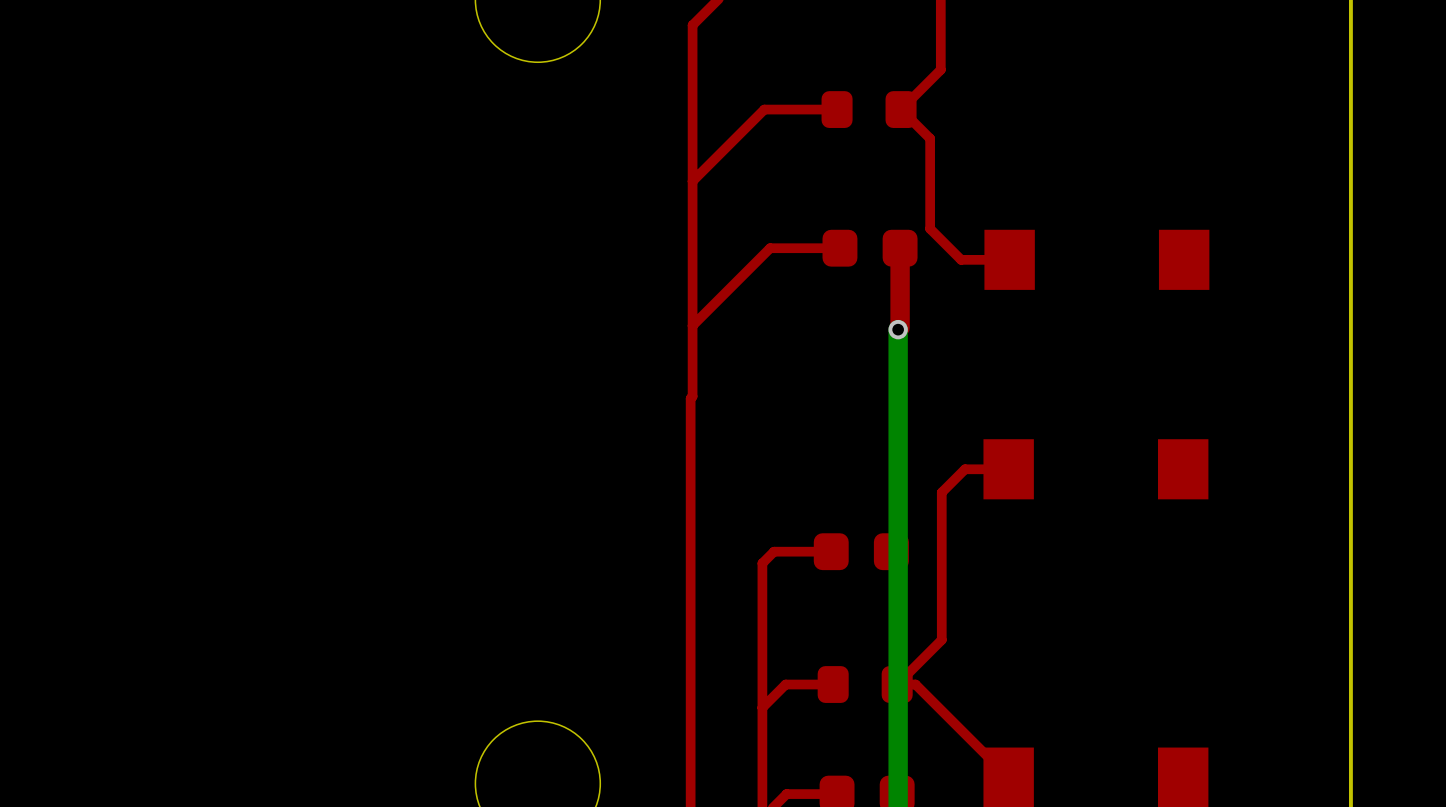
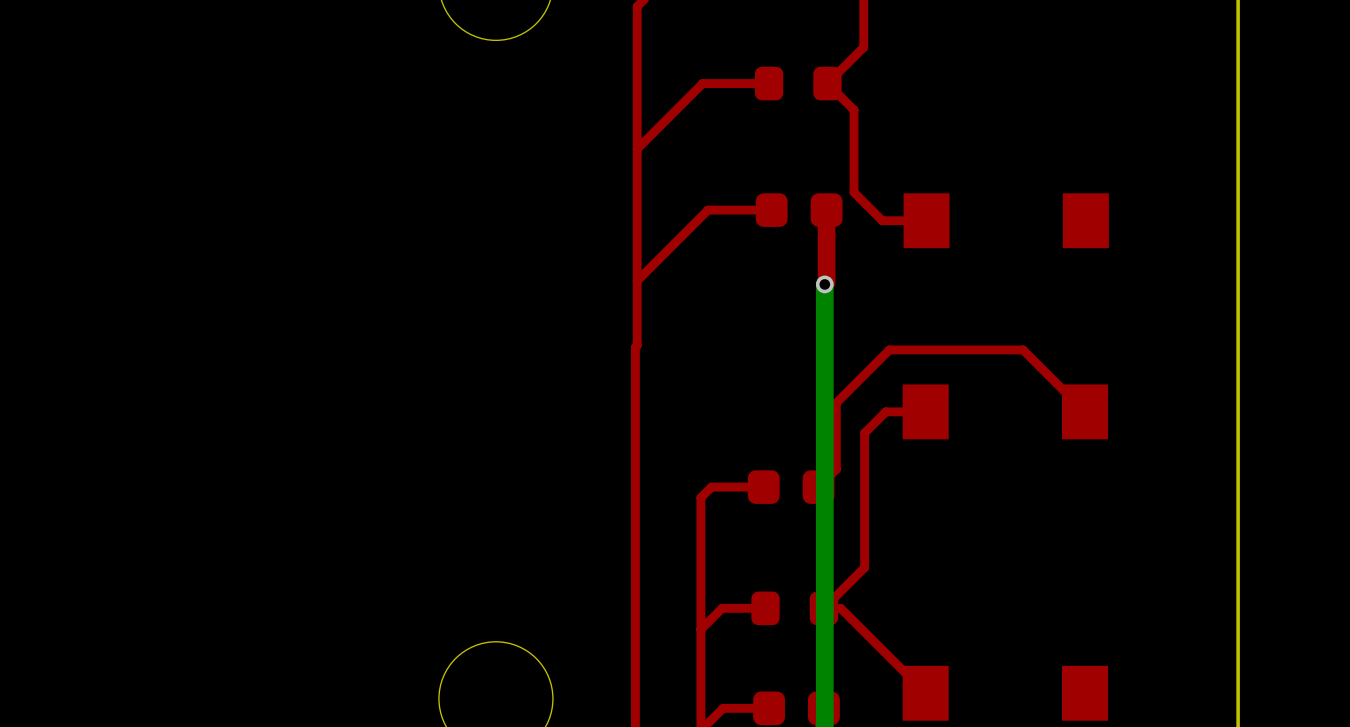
top track: none -> (1085, 411) (1023, 349) (889, 349) (836, 403) (836, 469) (818, 487)

